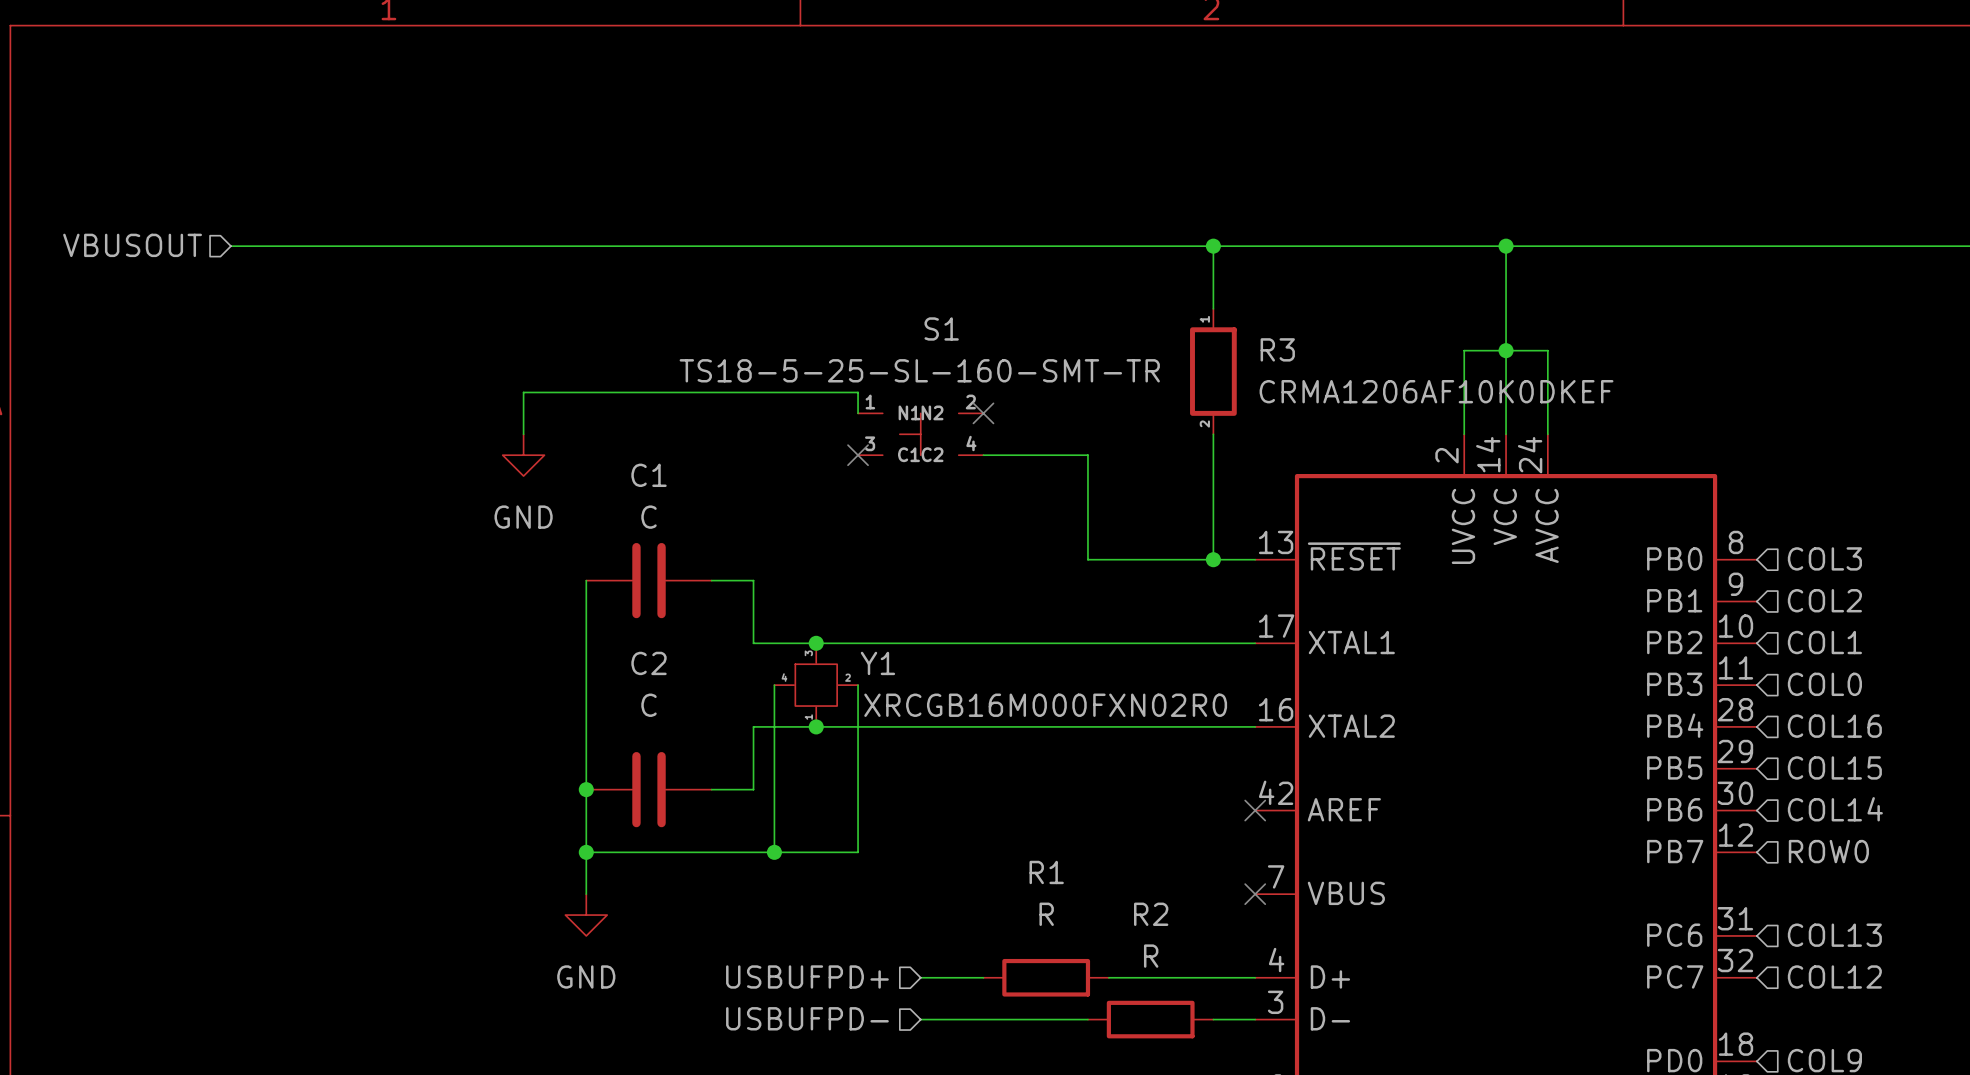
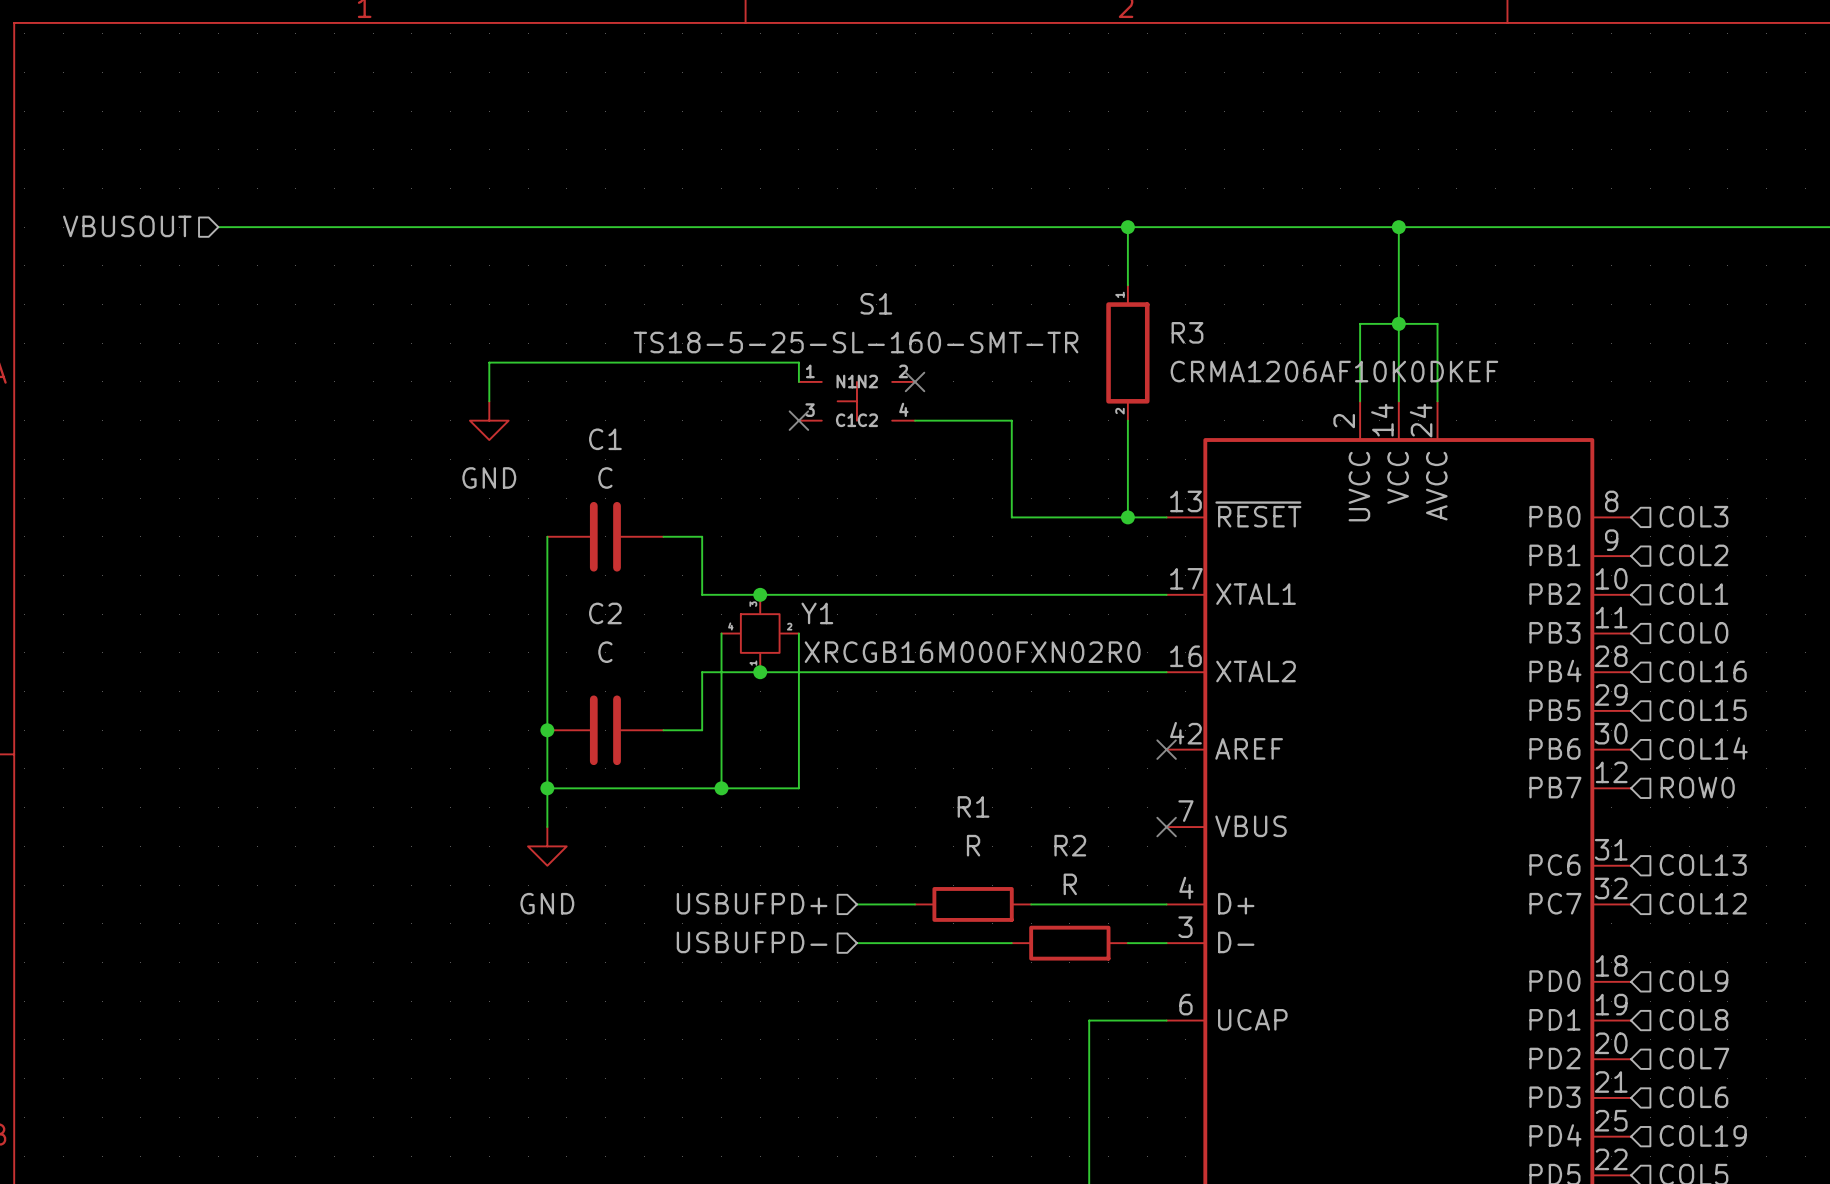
R3 symbol: [1190, 308, 1237, 435] -> [1106, 285, 1150, 421]

